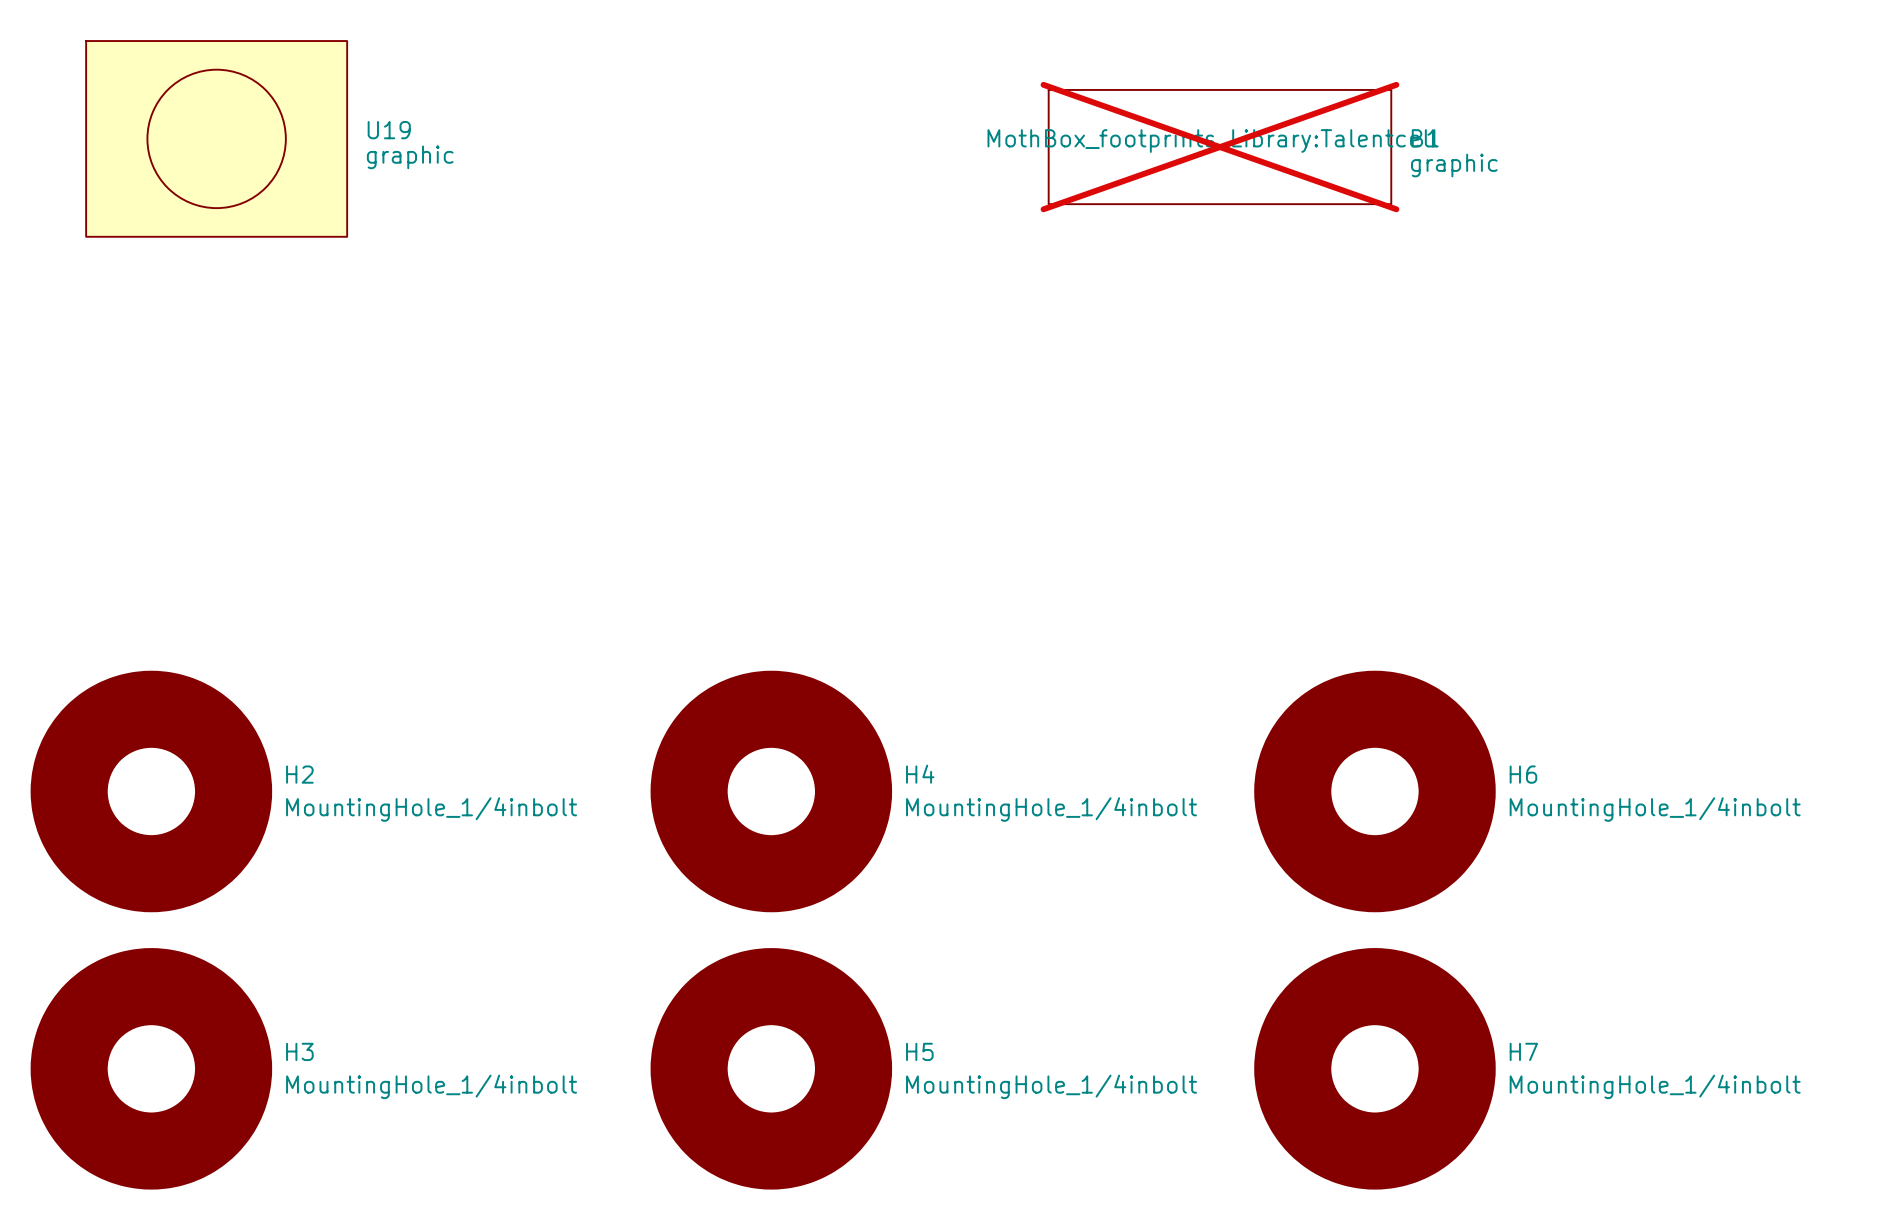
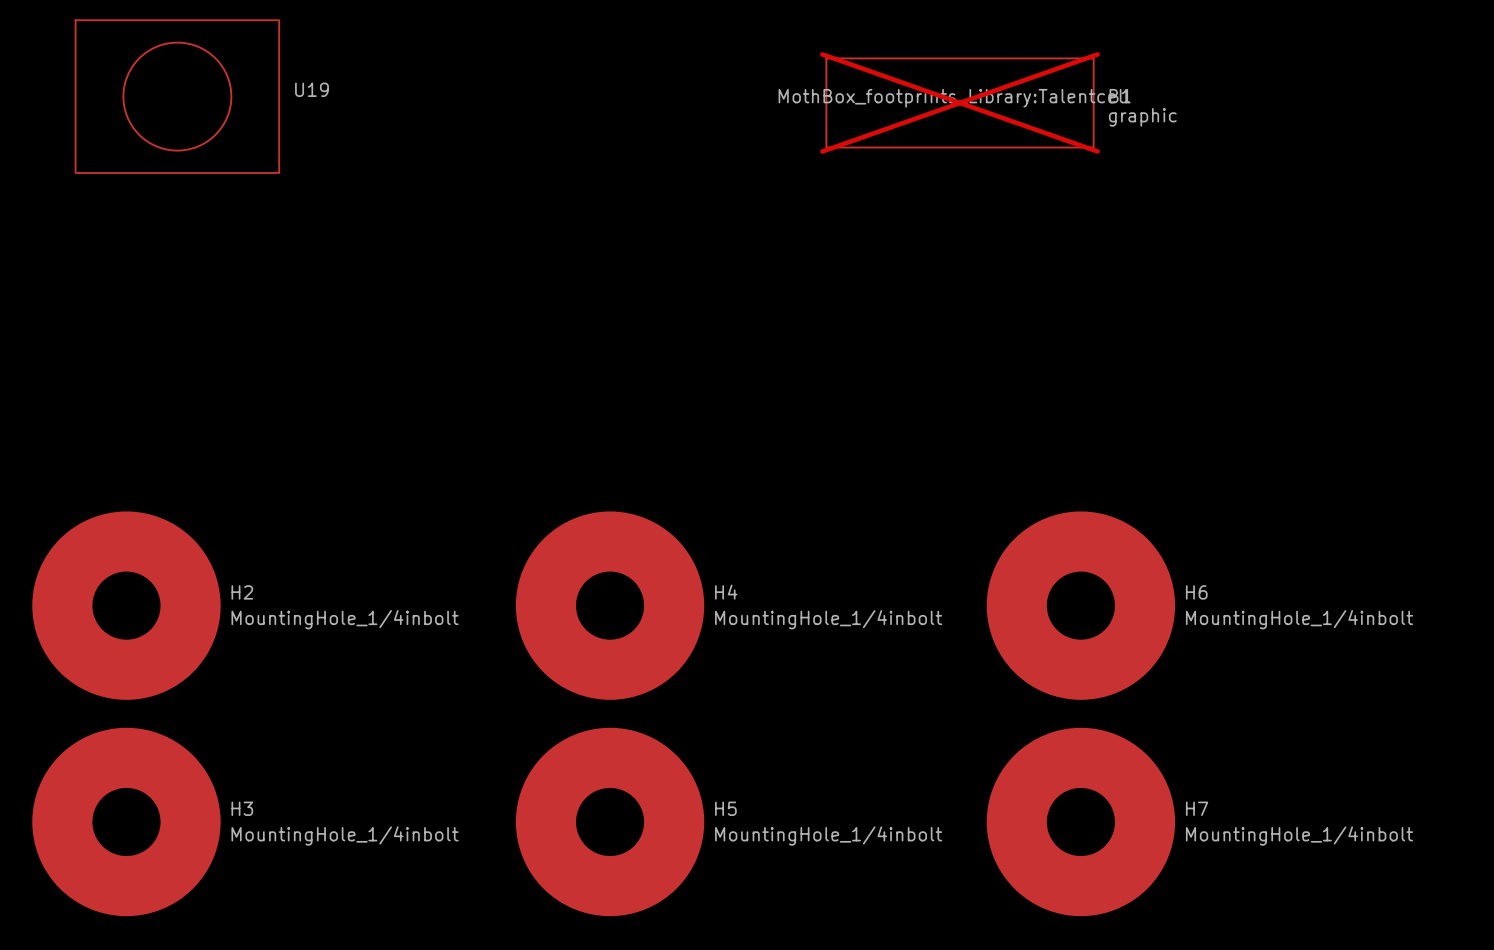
U19 value: graphic (410, 157) -> none

